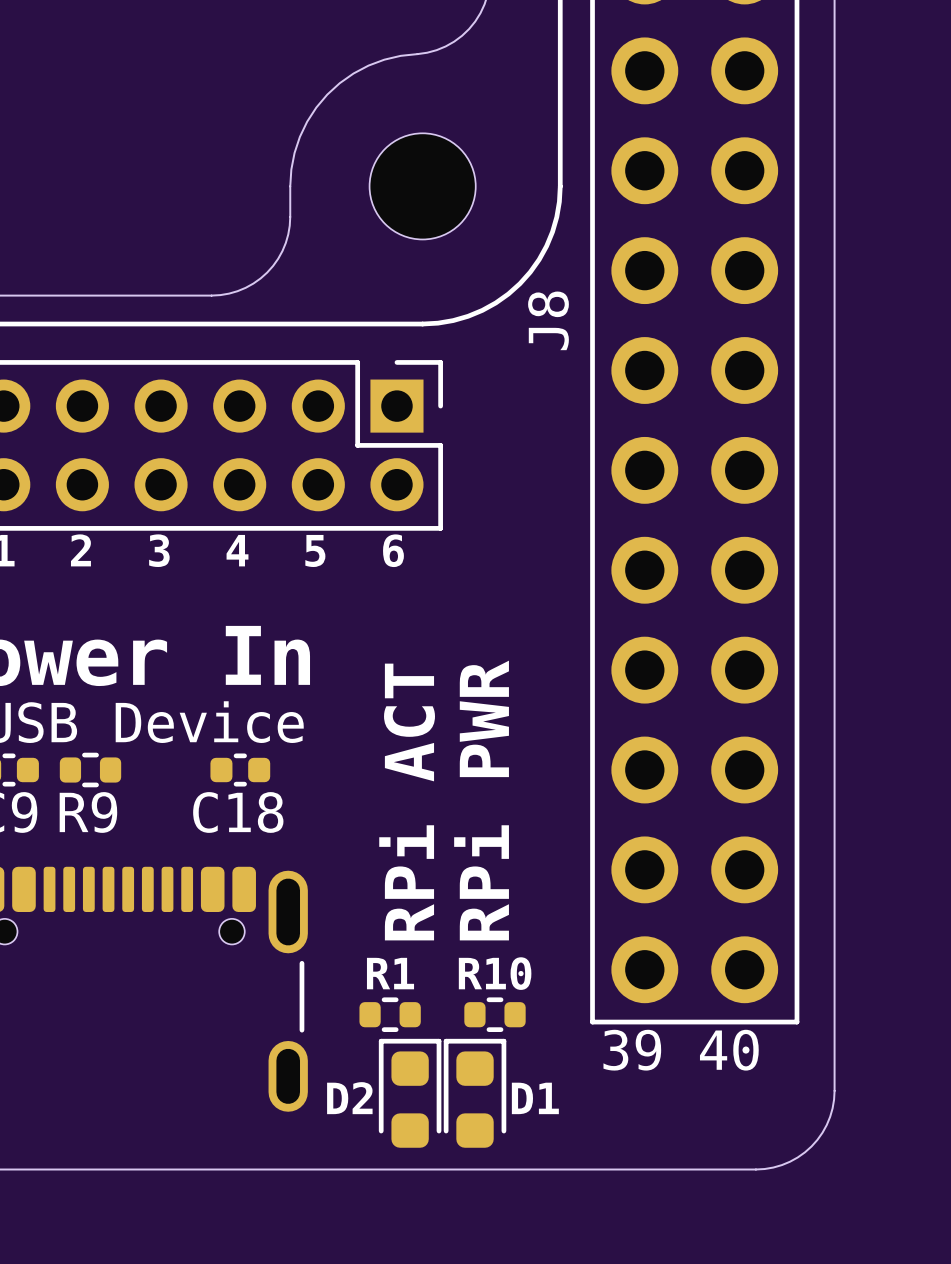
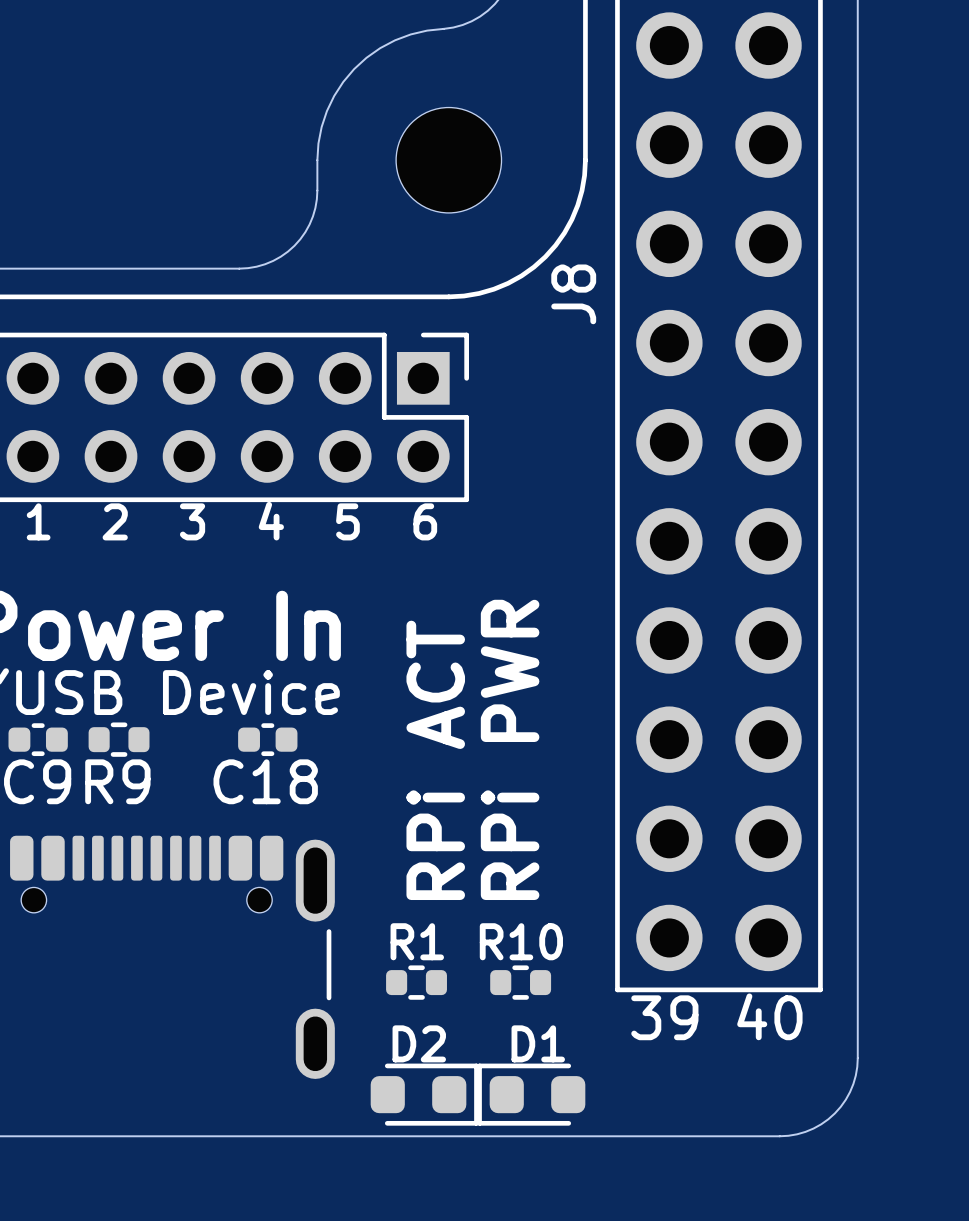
D2 rotation: 0° (410, 1093) -> 90° clockwise (424, 1094)
D1 rotation: 0° (475, 1093) -> 90° counterclockwise (531, 1094)

